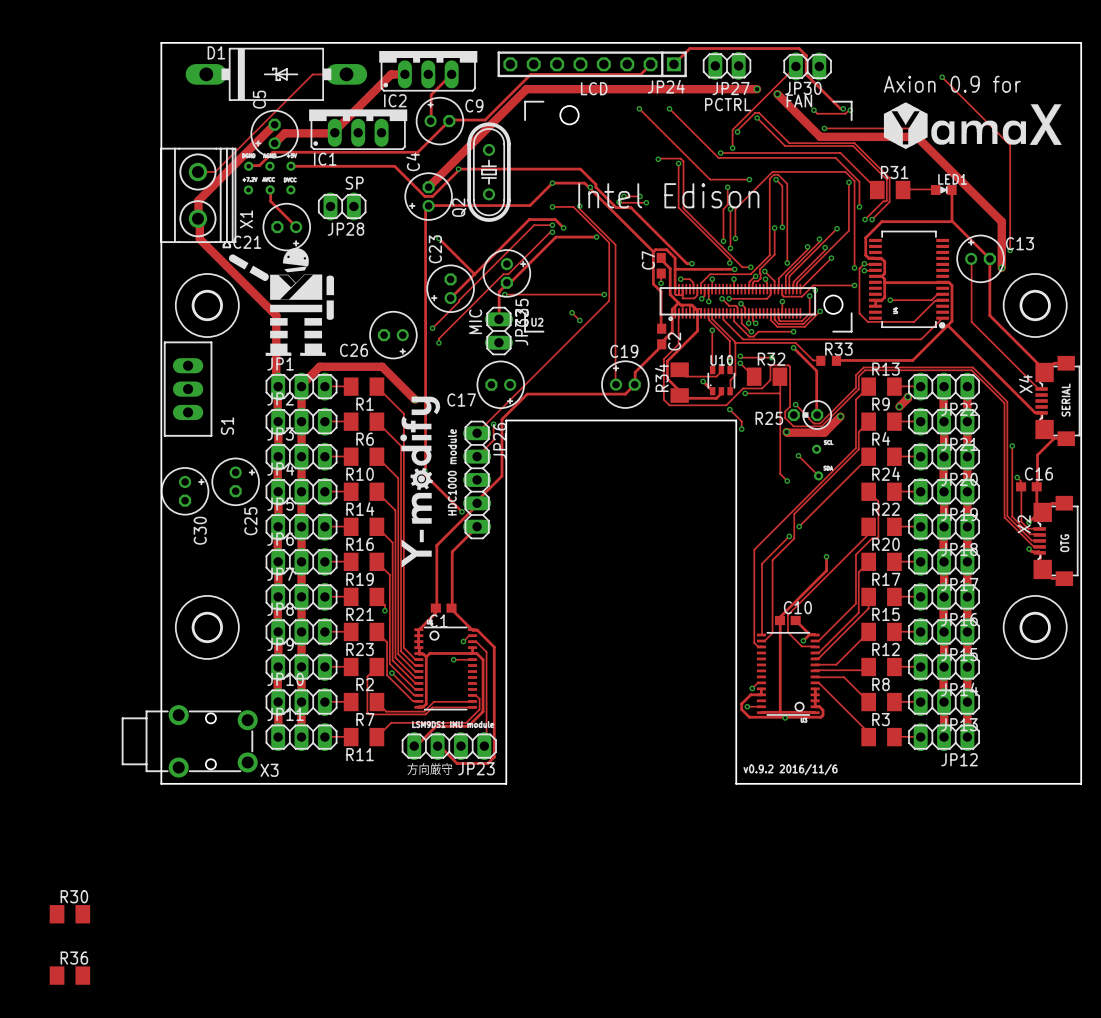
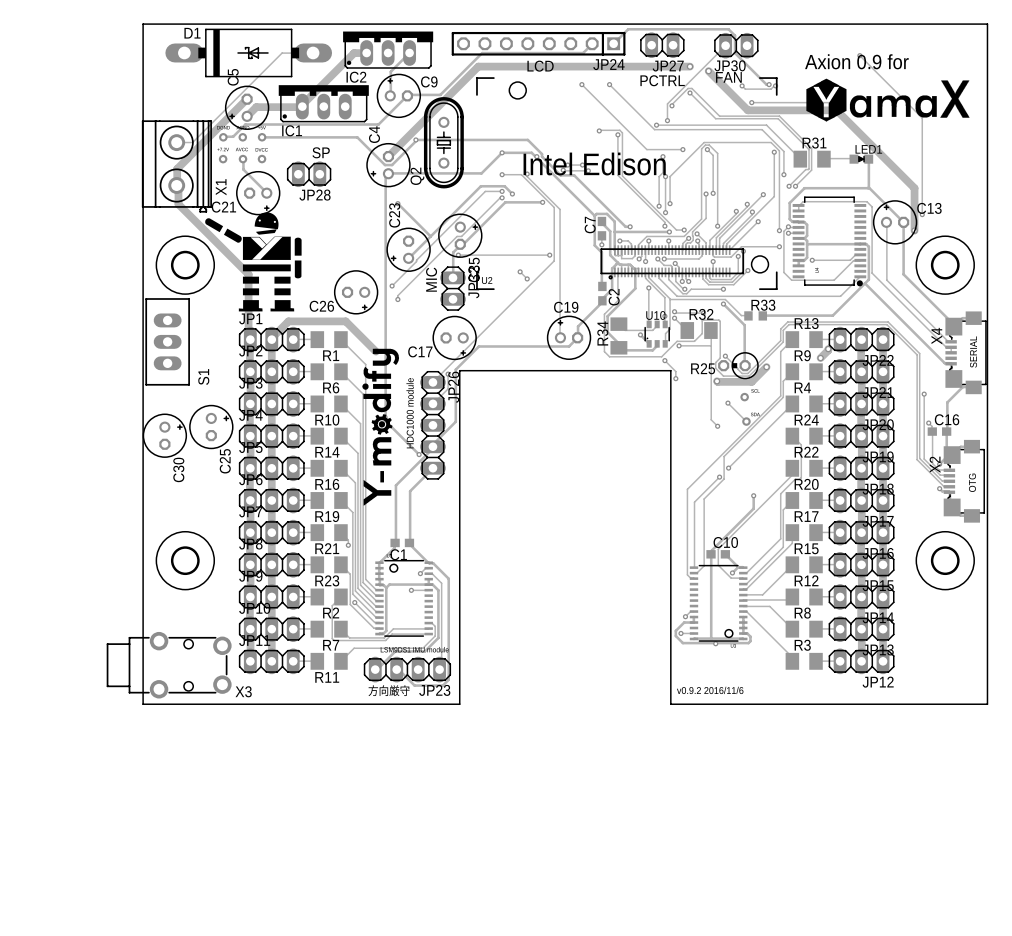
track: none -> (798, 210) (798, 205) (803, 201) (866, 201) (872, 206) (872, 273) (946, 347) (951, 347) (951, 352)
R30: (69, 914) -> none
R36: (69, 975) -> none

